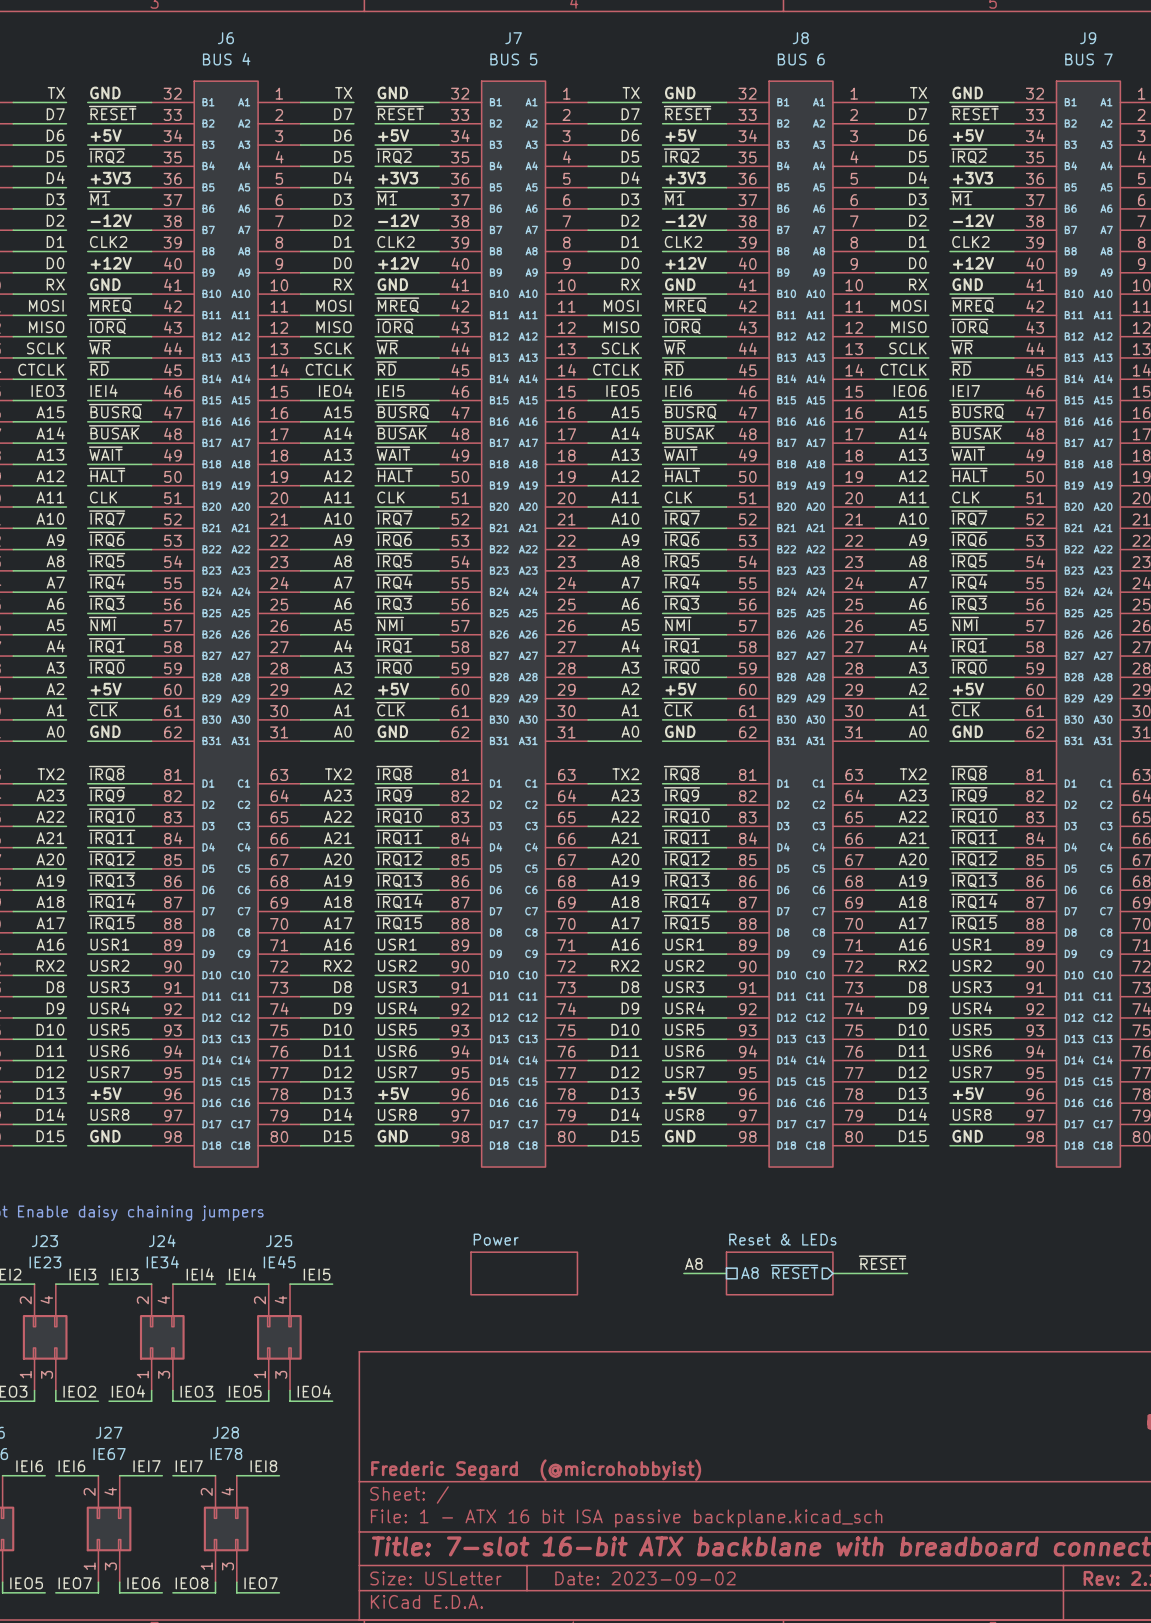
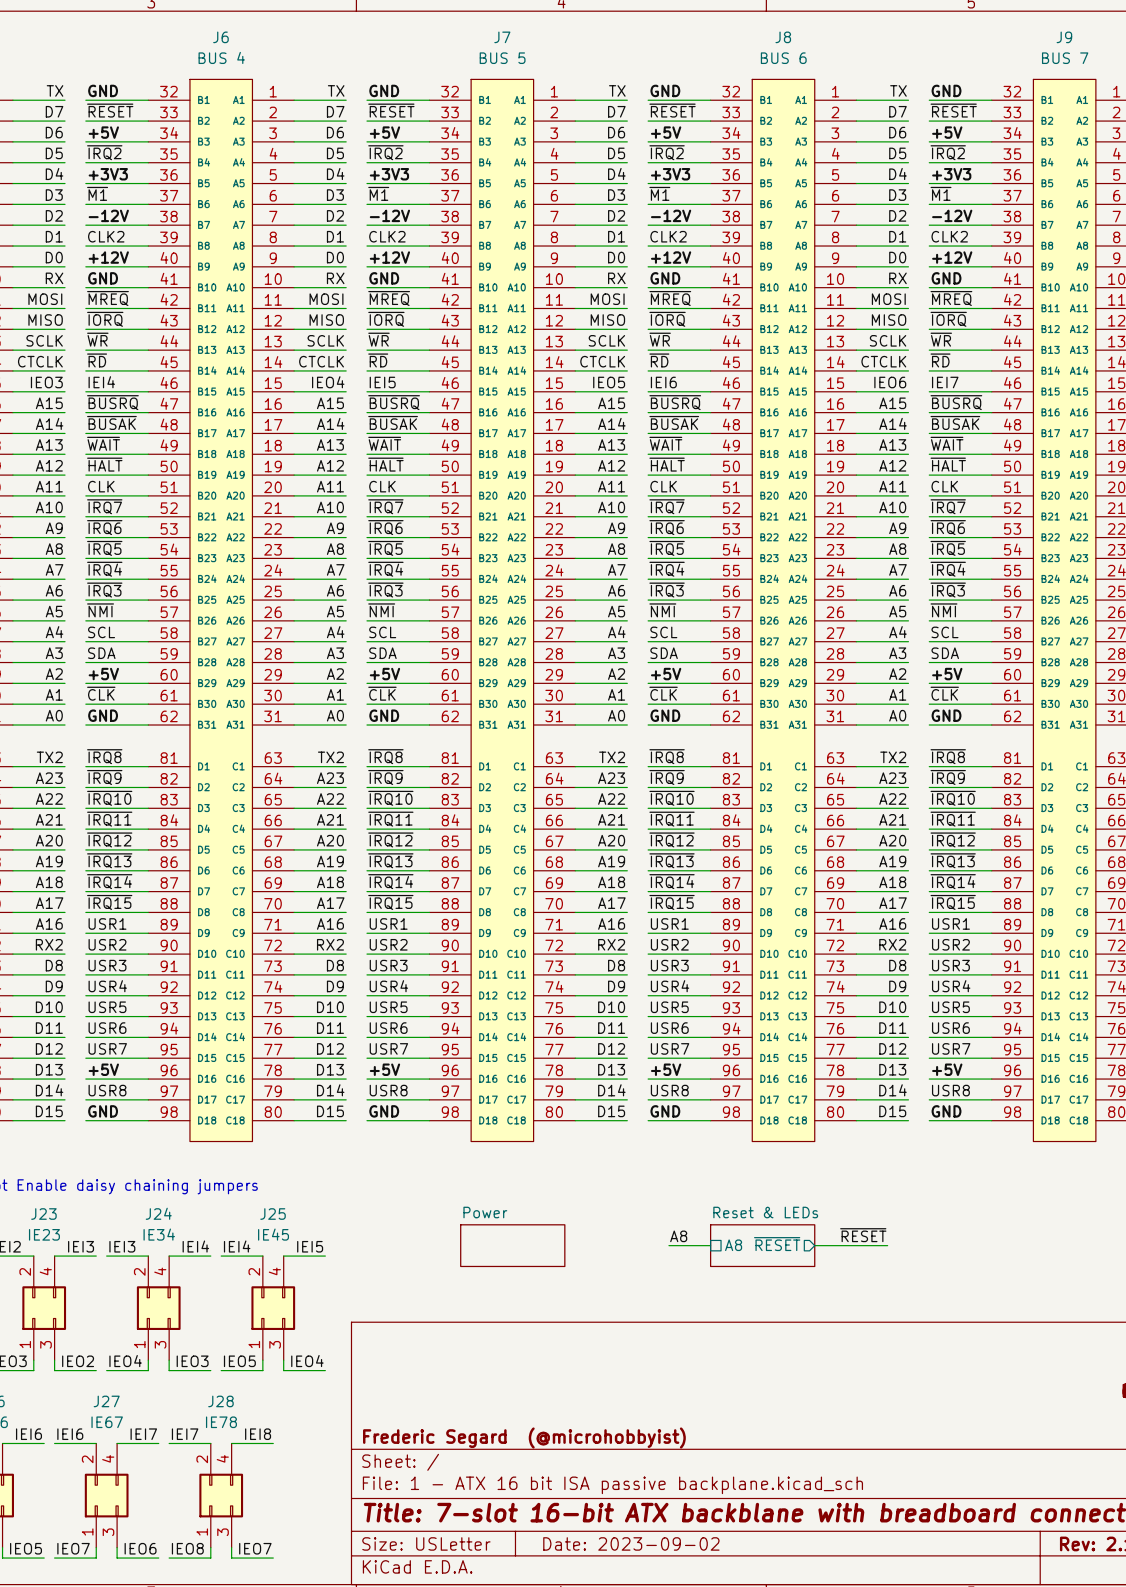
label: ~{IRQ1} (107, 645) -> SCL (101, 632)
label: ~{IRQ1} (394, 645) -> SCL (382, 632)
label: ~{IRQ1} (681, 645) -> SCL (663, 632)
label: ~{IRQ1} (969, 645) -> SCL (944, 632)
label: ~{IRQ0} (107, 667) -> SDA (101, 653)
label: ~{IRQ0} (394, 667) -> SDA (382, 653)
label: ~{IRQ0} (681, 667) -> SDA (664, 653)
label: ~{IRQ0} (969, 667) -> SDA (945, 653)

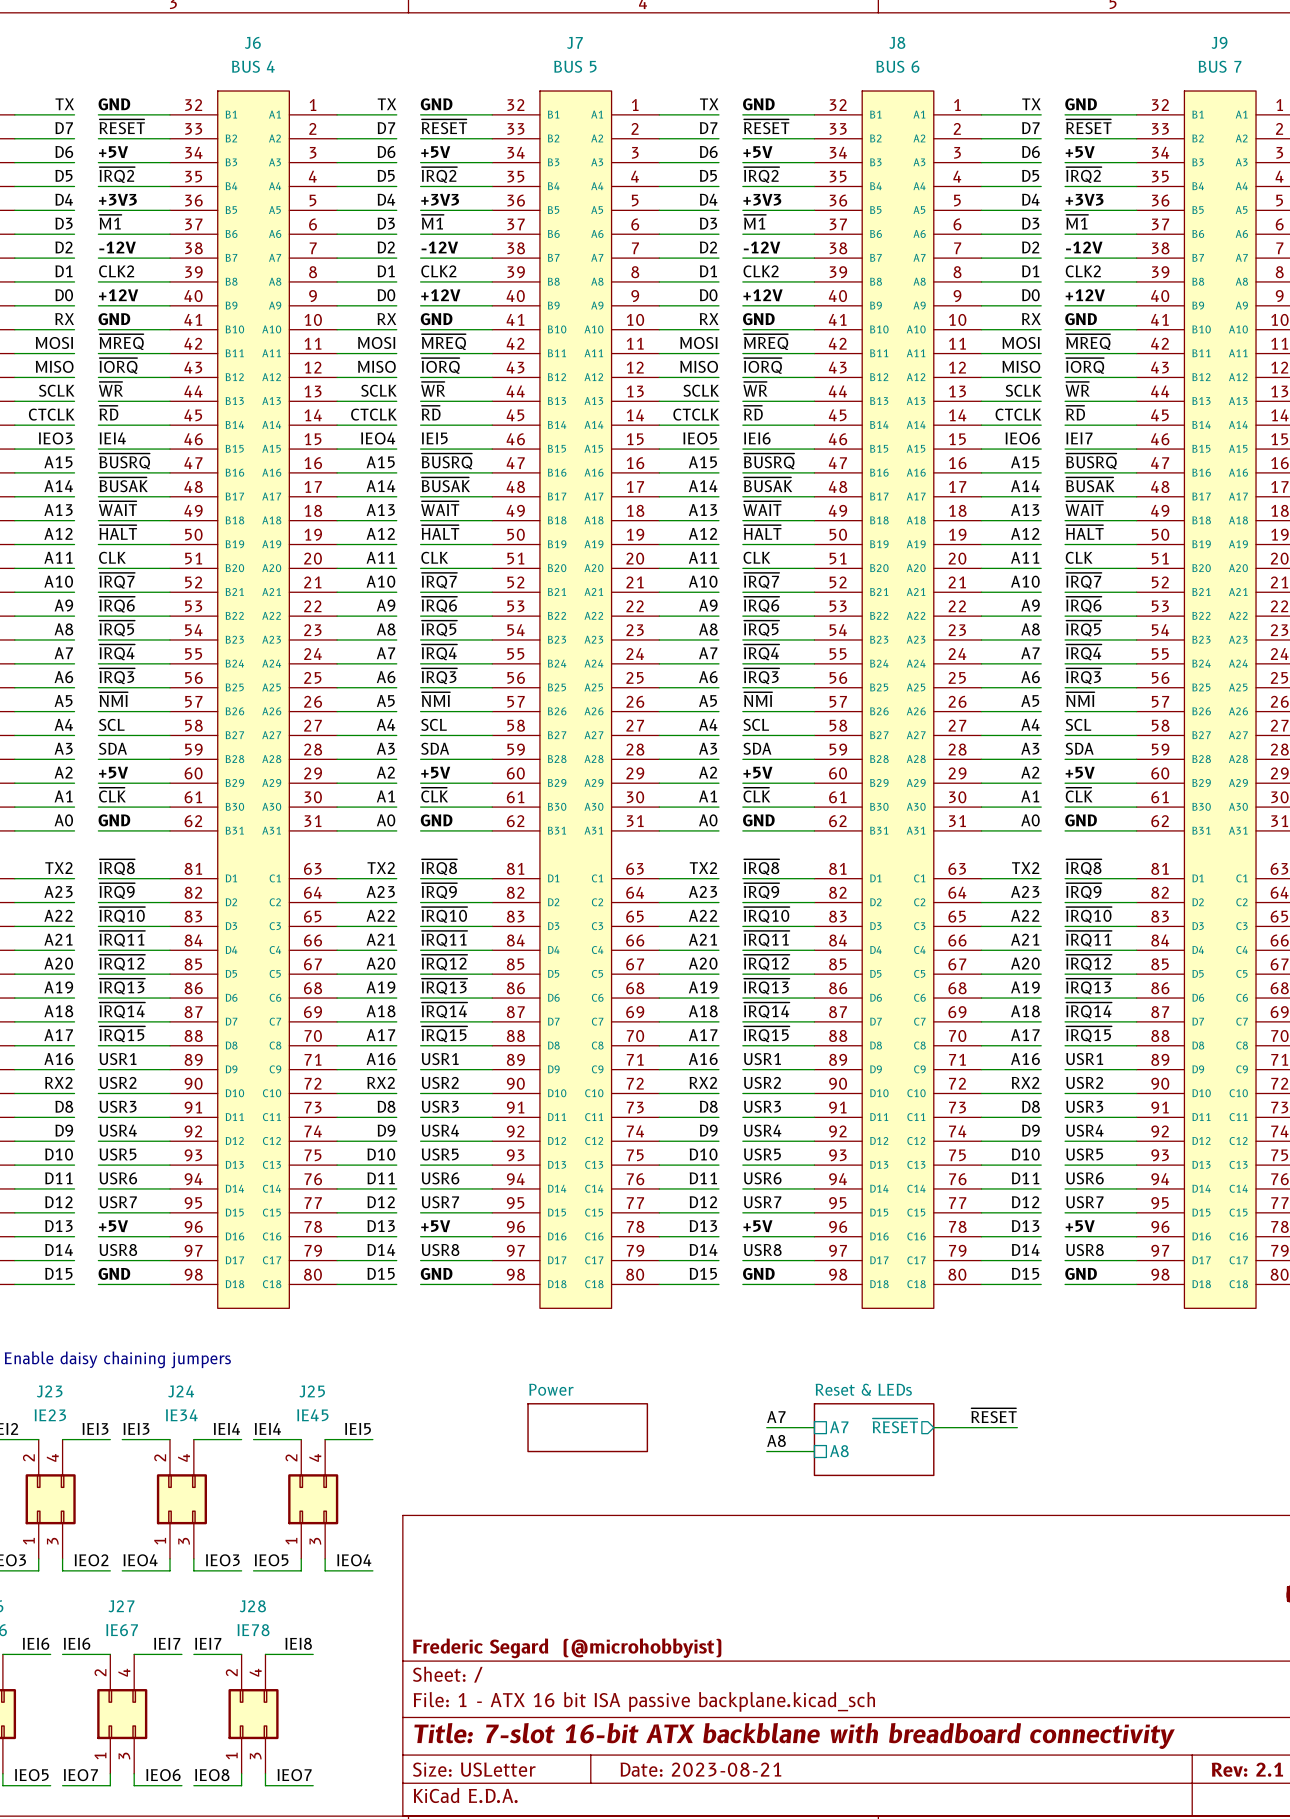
label: A8 (678, 1236) -> A7 (776, 1417)
sheet pin: A8 (733, 1245) -> A7 (839, 1427)
sheet Reset & LEDs: (762, 1245) -> none
sheet Reset & LEDs: none -> (874, 1439)
label: none -> A8 (776, 1440)
wire: none -> (766, 1451) (814, 1451)
sheet pin: none -> A8 (839, 1451)
title block: Date: 2023-09-02 (631, 1543) -> Date: 2023-08-21 (700, 1769)

